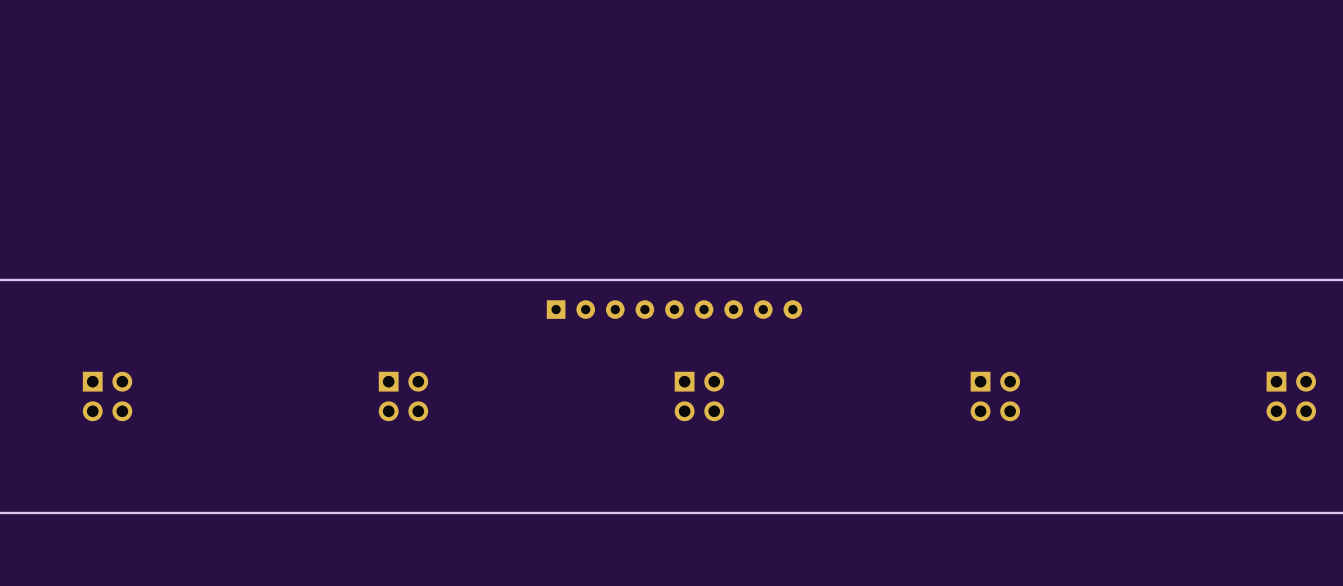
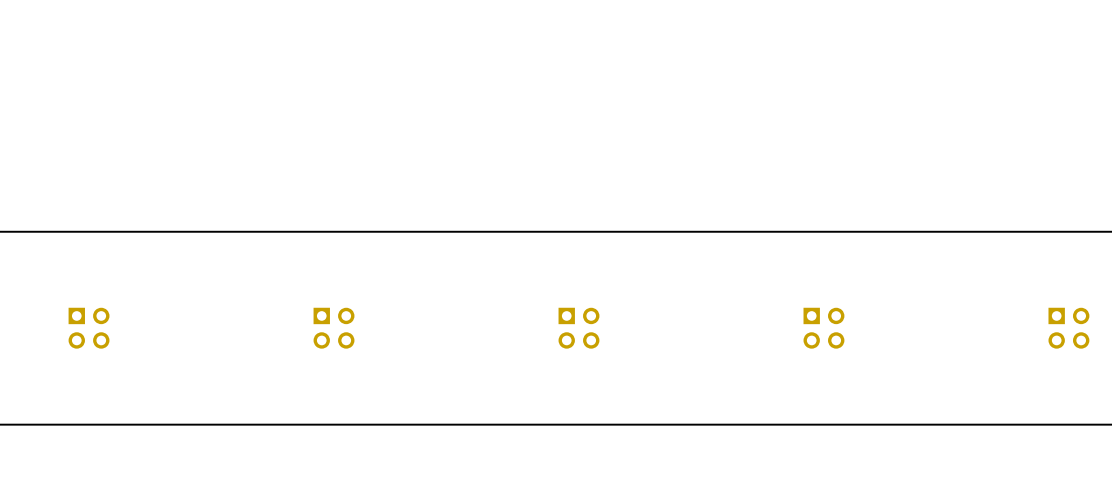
part: (674, 309) -> none

